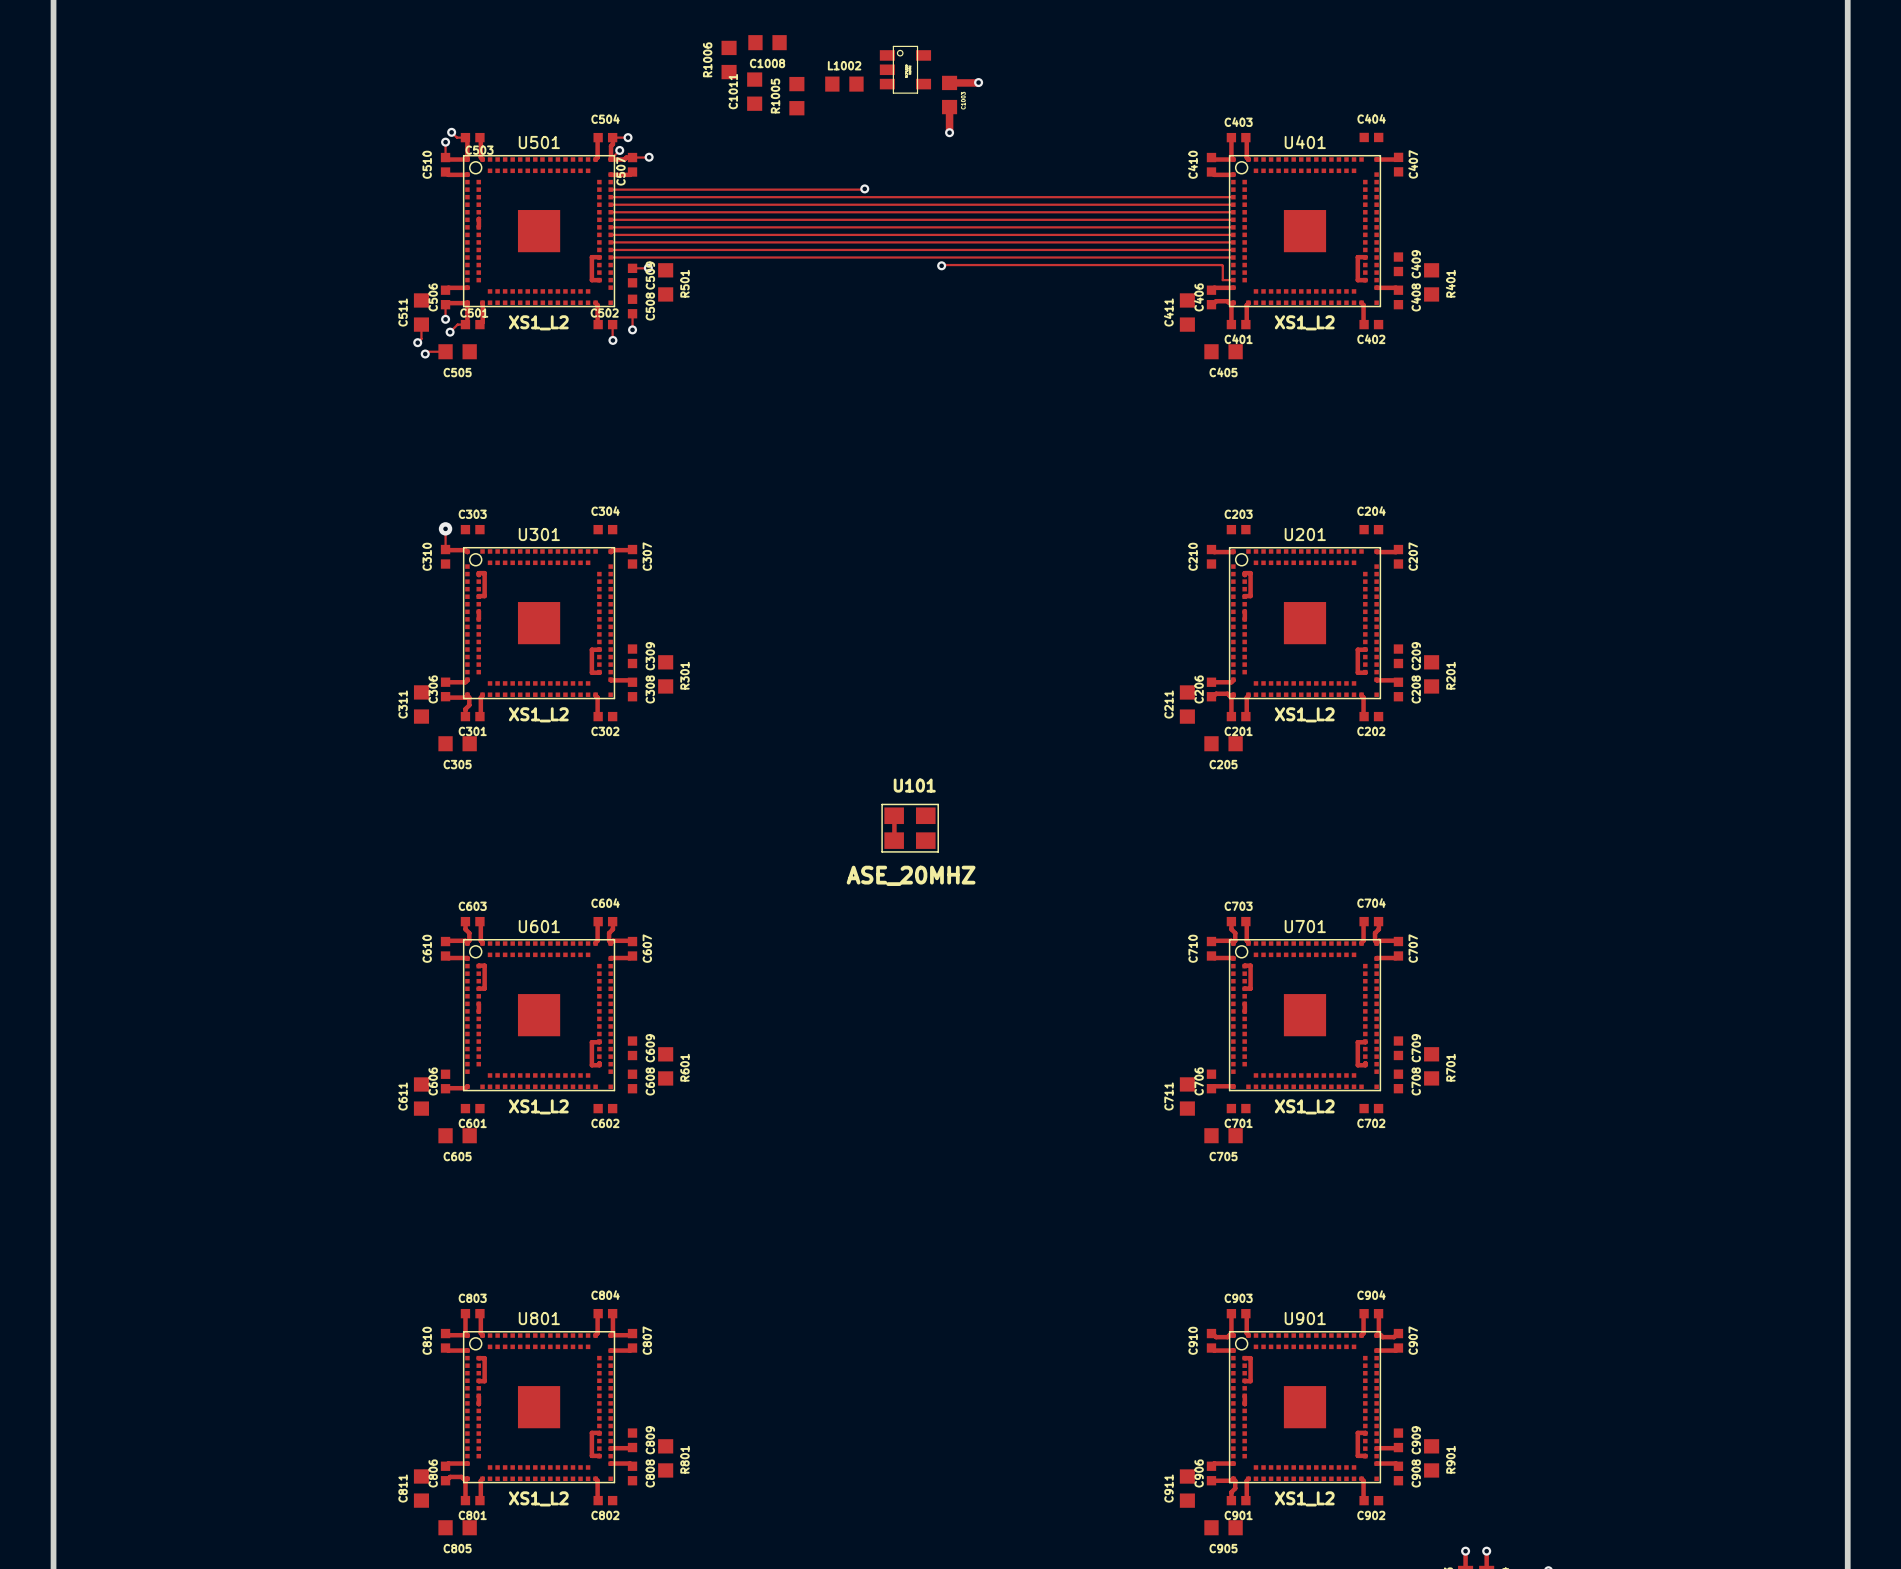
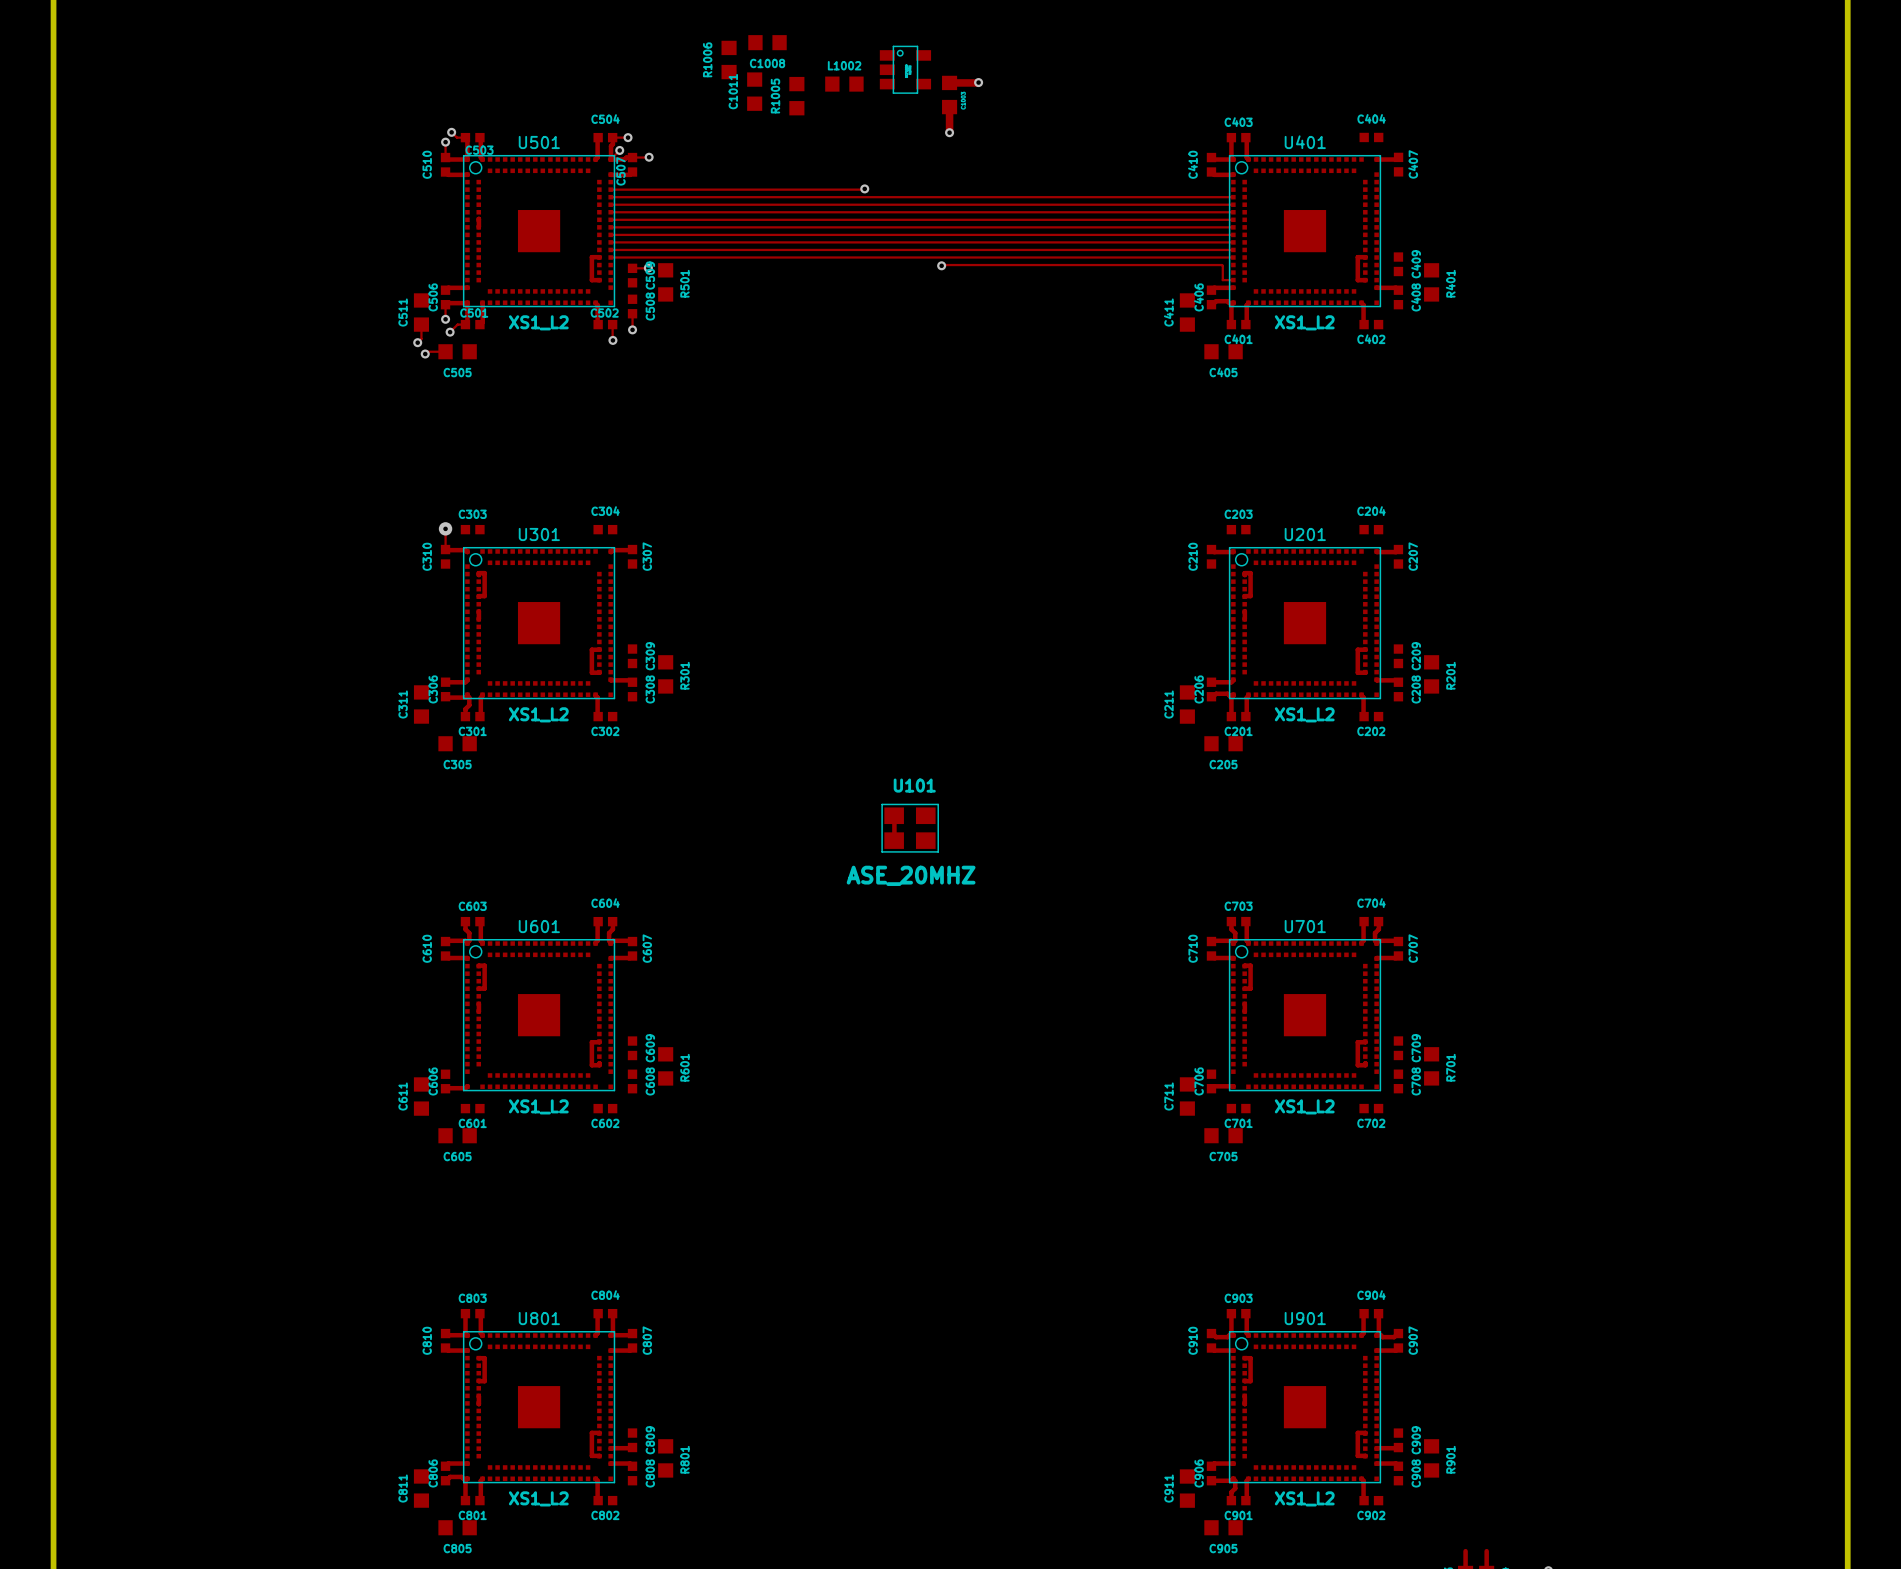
via: (1465, 1551) -> none
via: (1486, 1551) -> none

